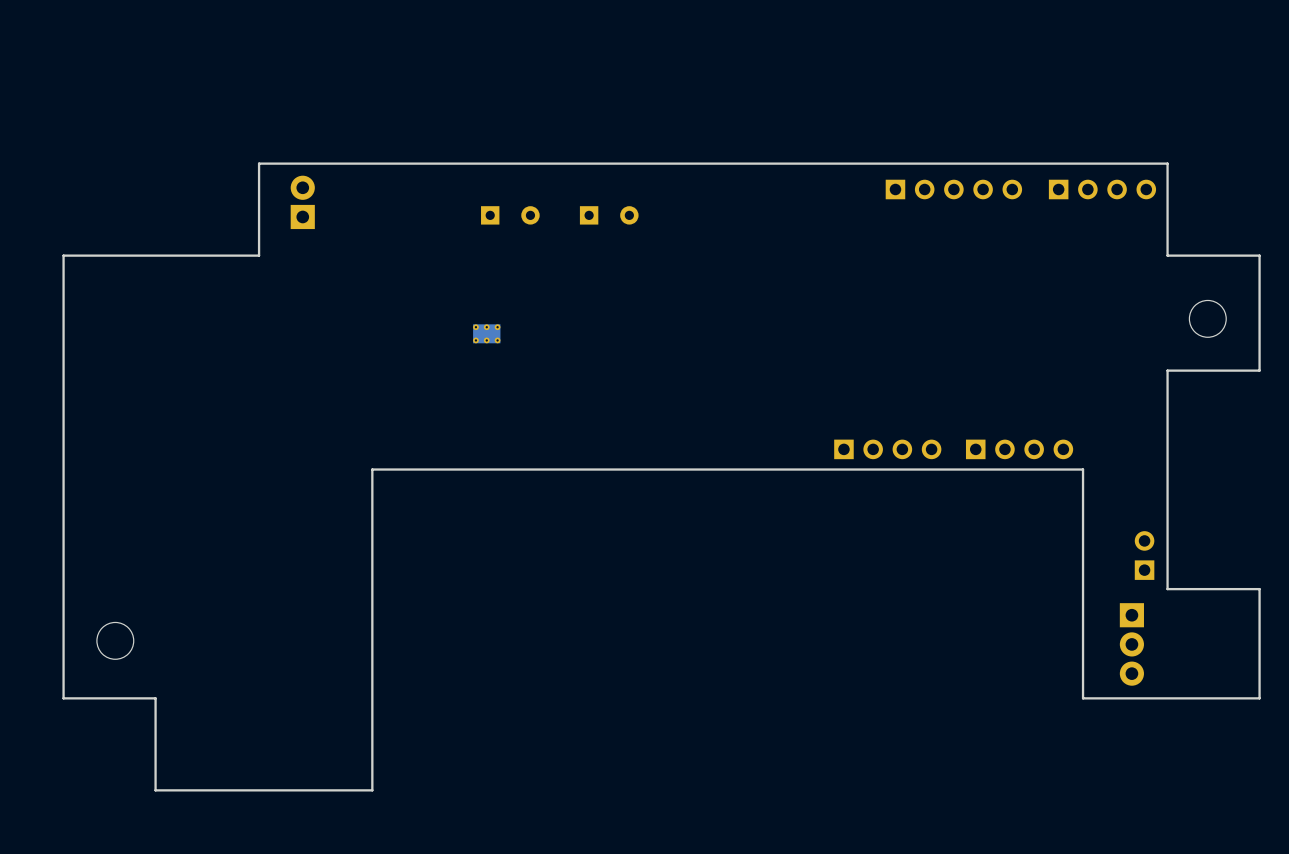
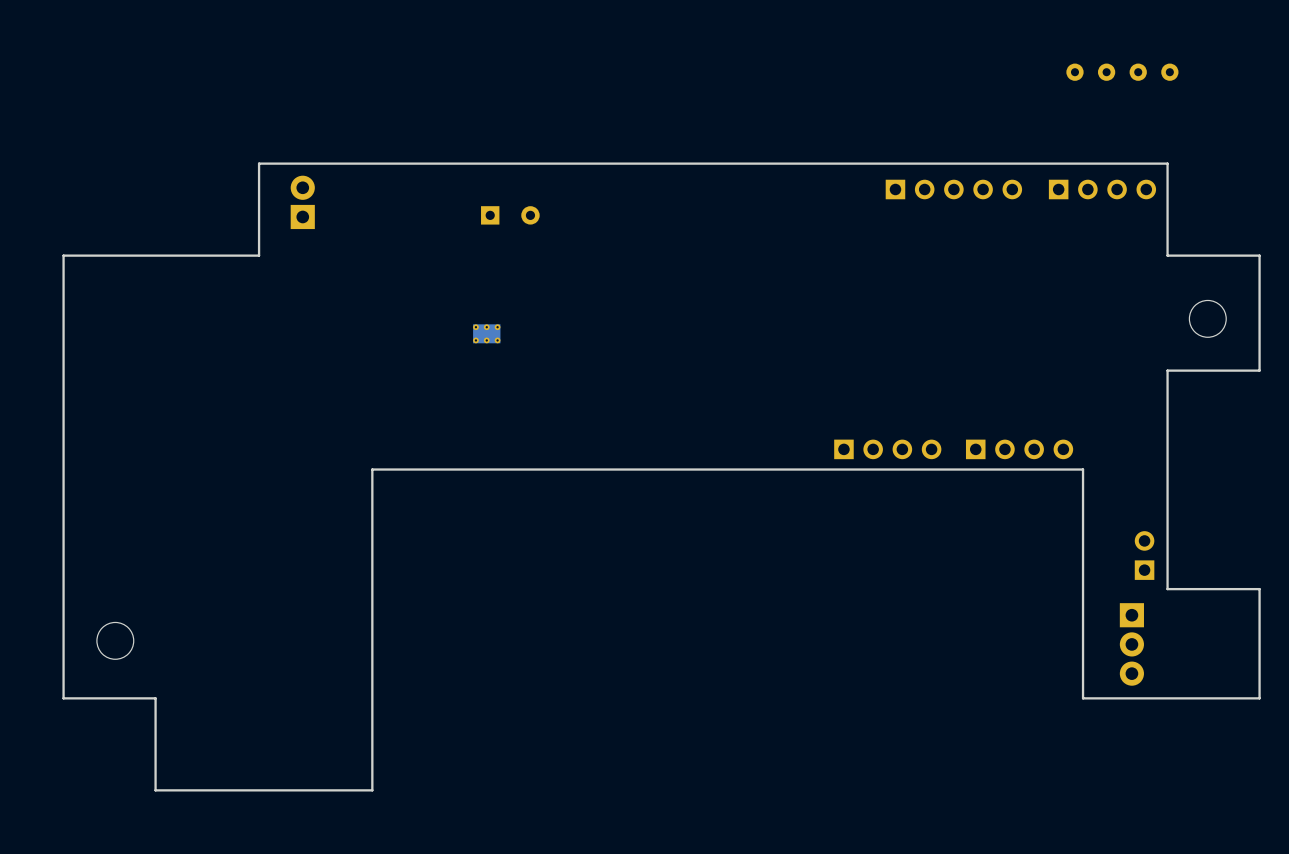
part: none -> (1074, 72)
part: none -> (1106, 72)
part: none -> (1138, 72)
part: none -> (1169, 72)
part: (609, 215) -> none

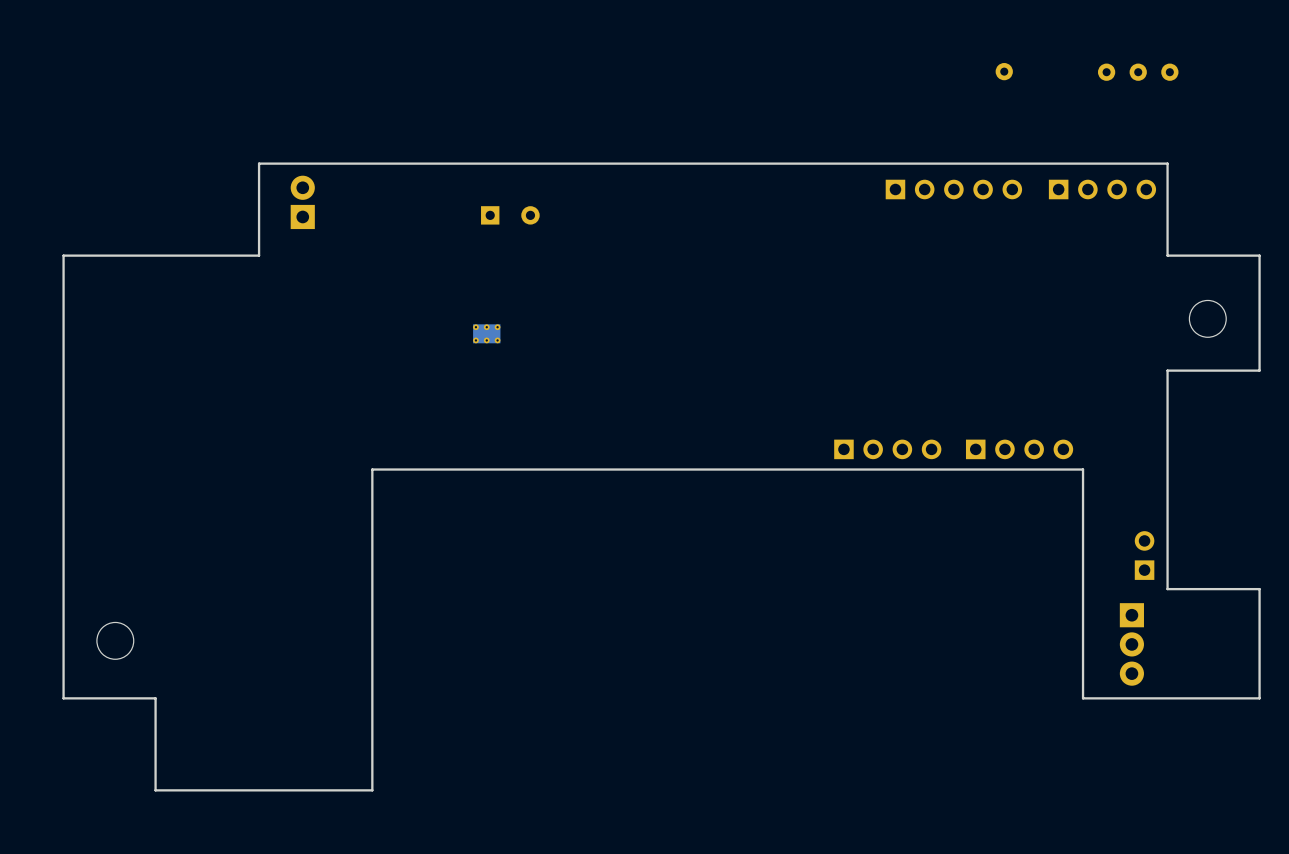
part position: (1074, 72) -> (1004, 71)

